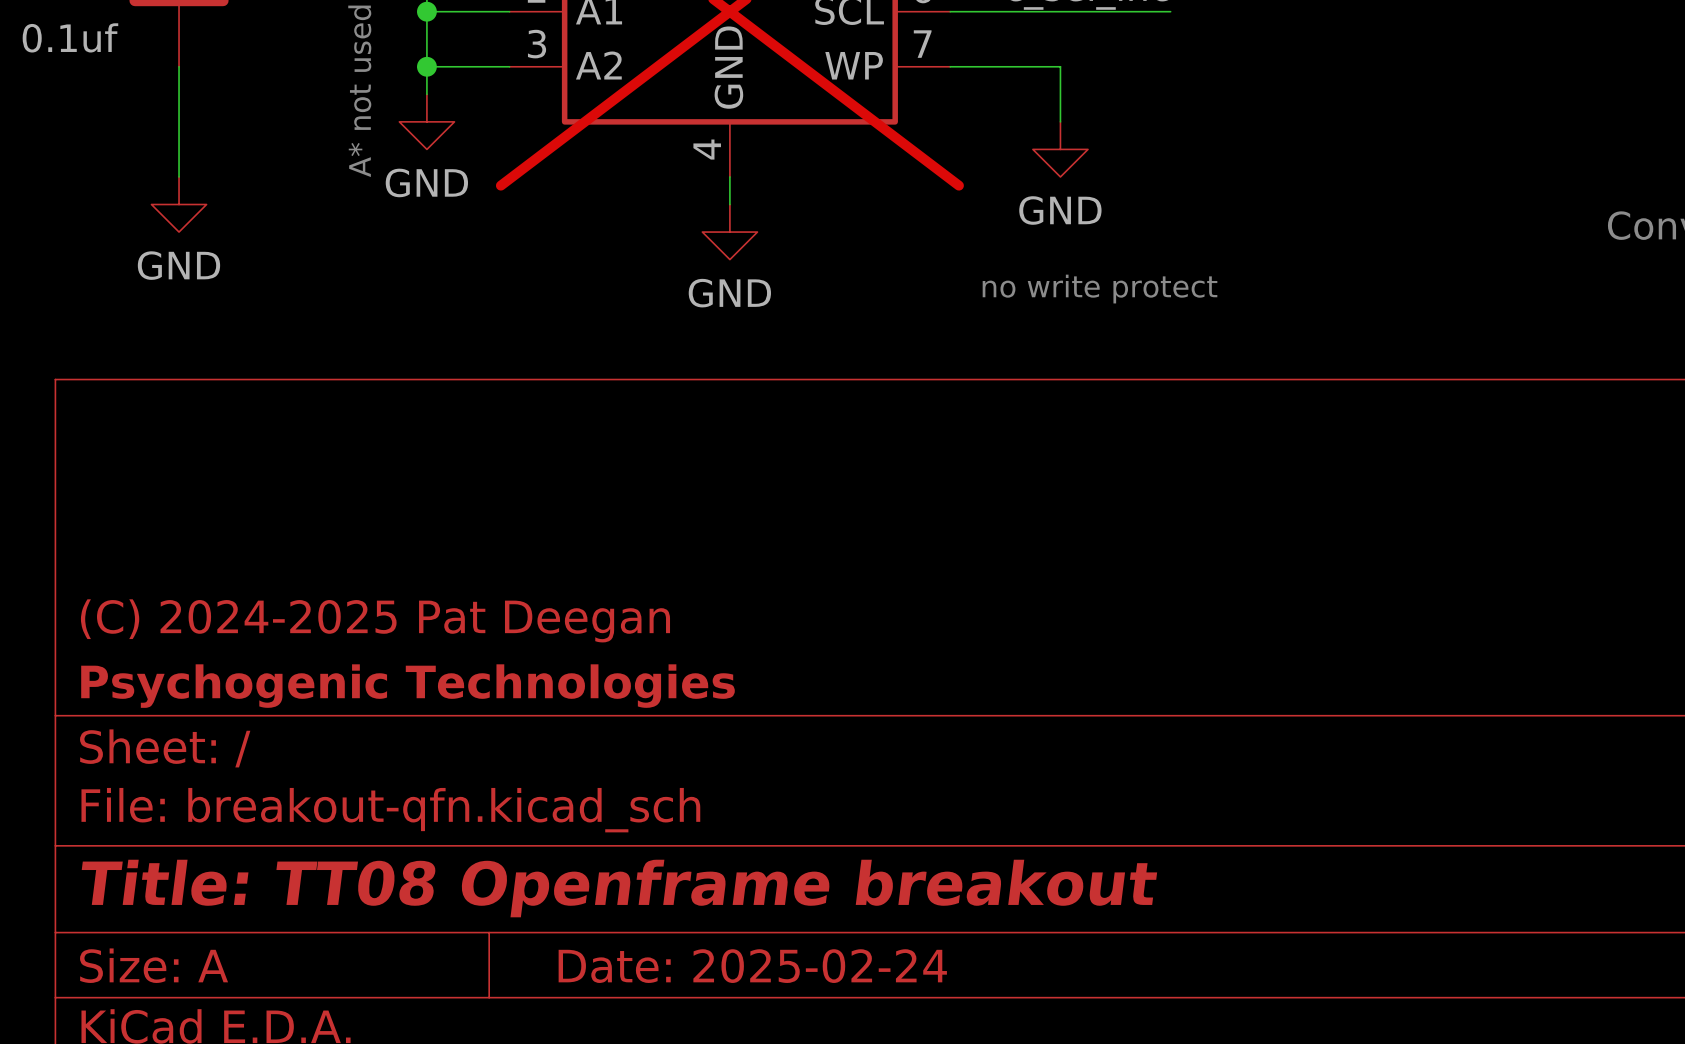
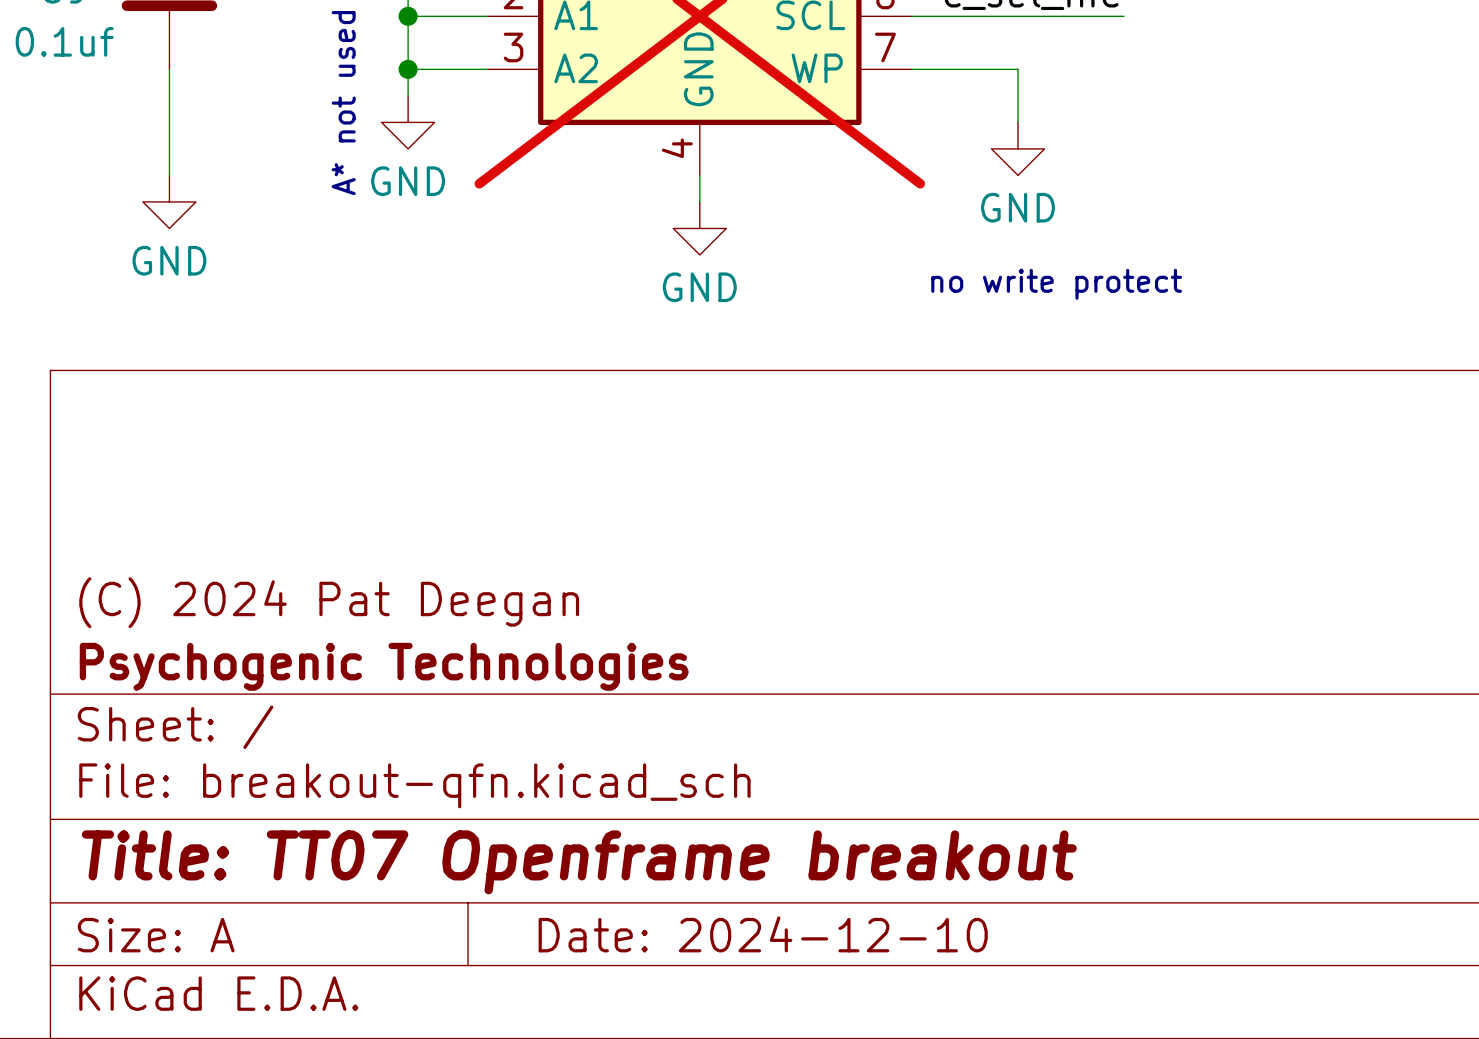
title block: (C) 2024-2025 Pat Deegan (375, 620) -> (C) 2024 Pat Deegan (329, 602)
title block: Title: TT08 Openframe breakout (619, 888) -> Title: TT07 Openframe breakout (579, 862)
title block: Date: 2025-02-24 (752, 966) -> Date: 2024-12-10 (763, 934)

